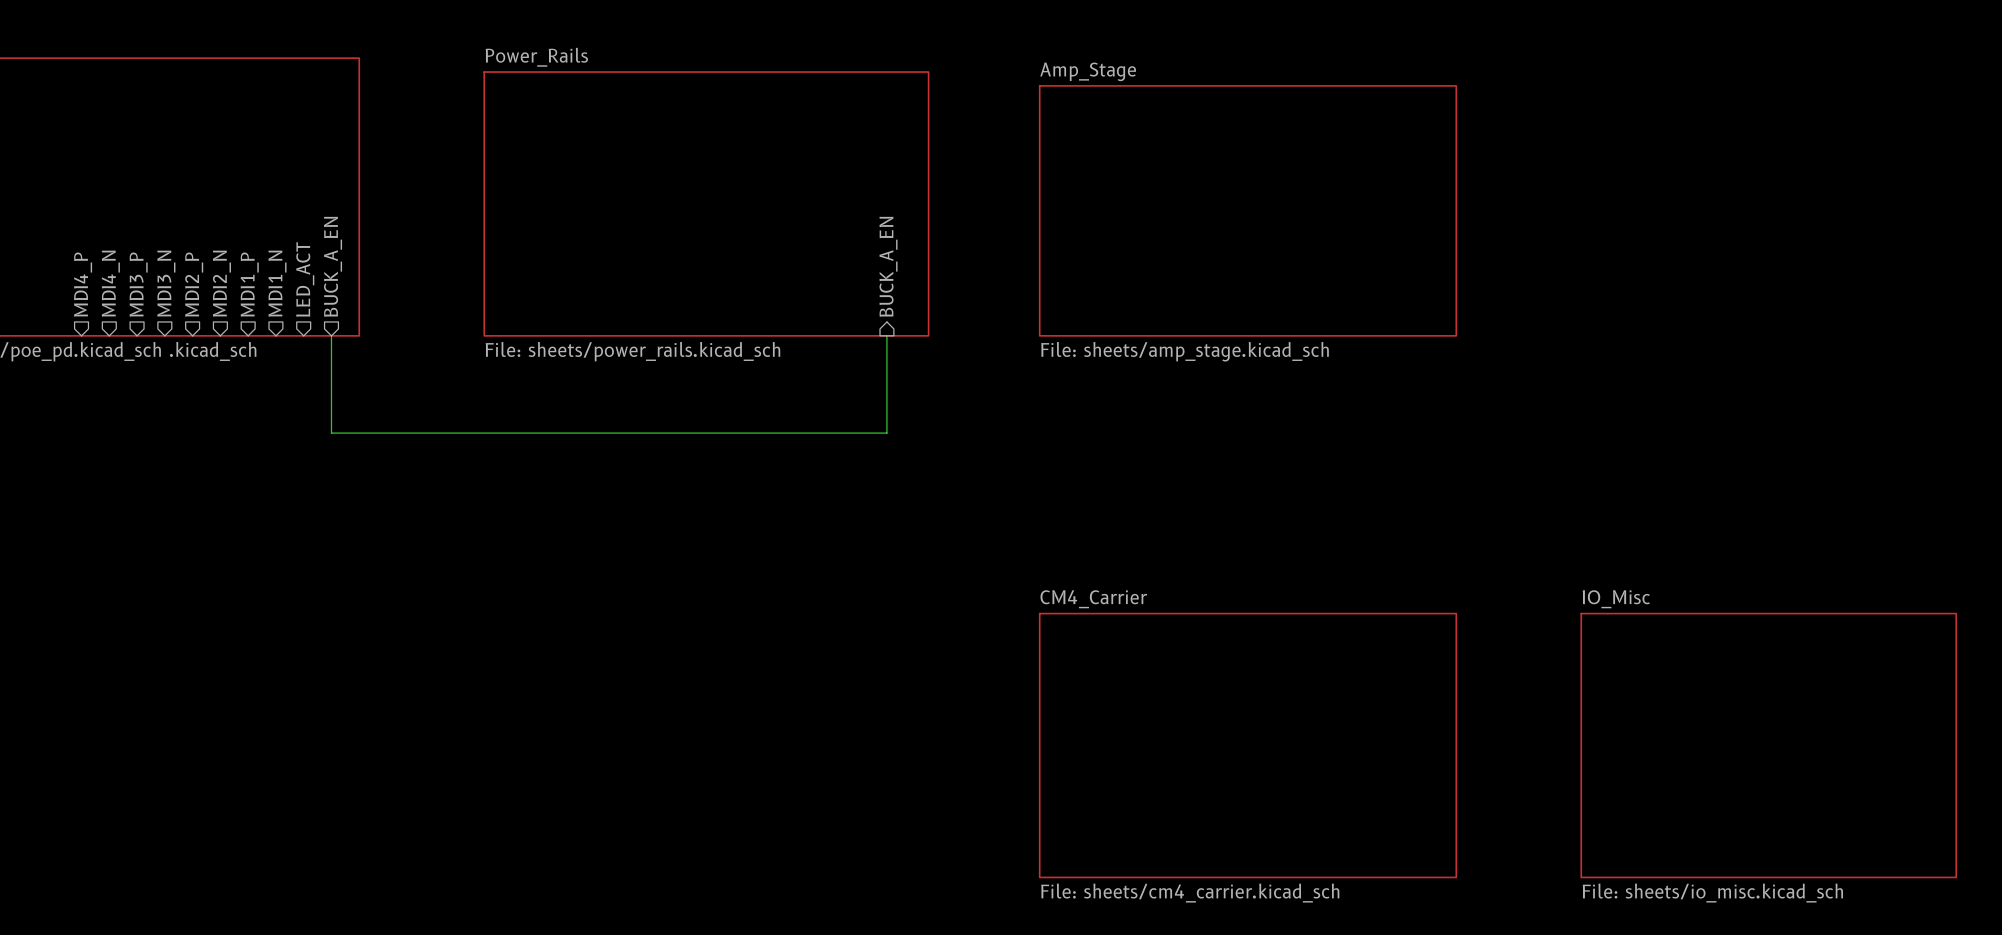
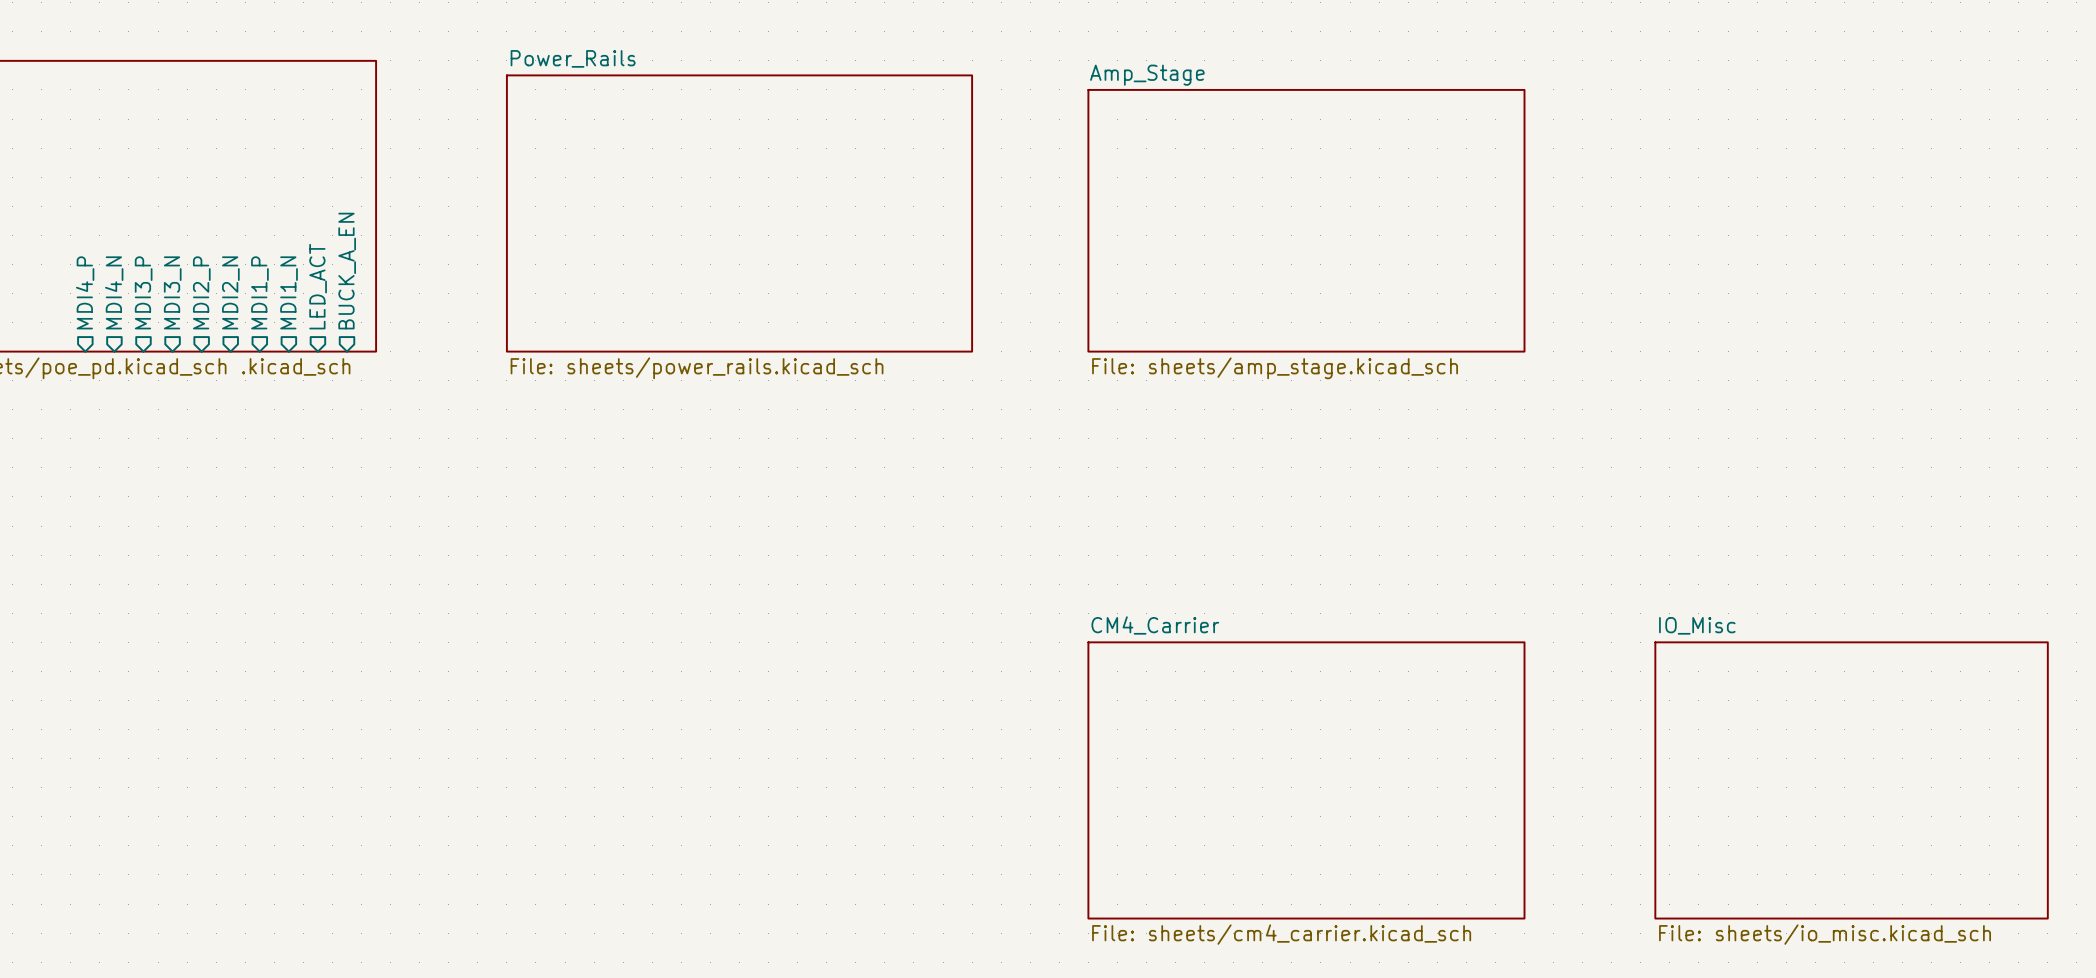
sheet pin: BUCK_A_EN (888, 266) -> none
wire: (331, 335) (331, 433) (886, 433) (886, 335) -> none

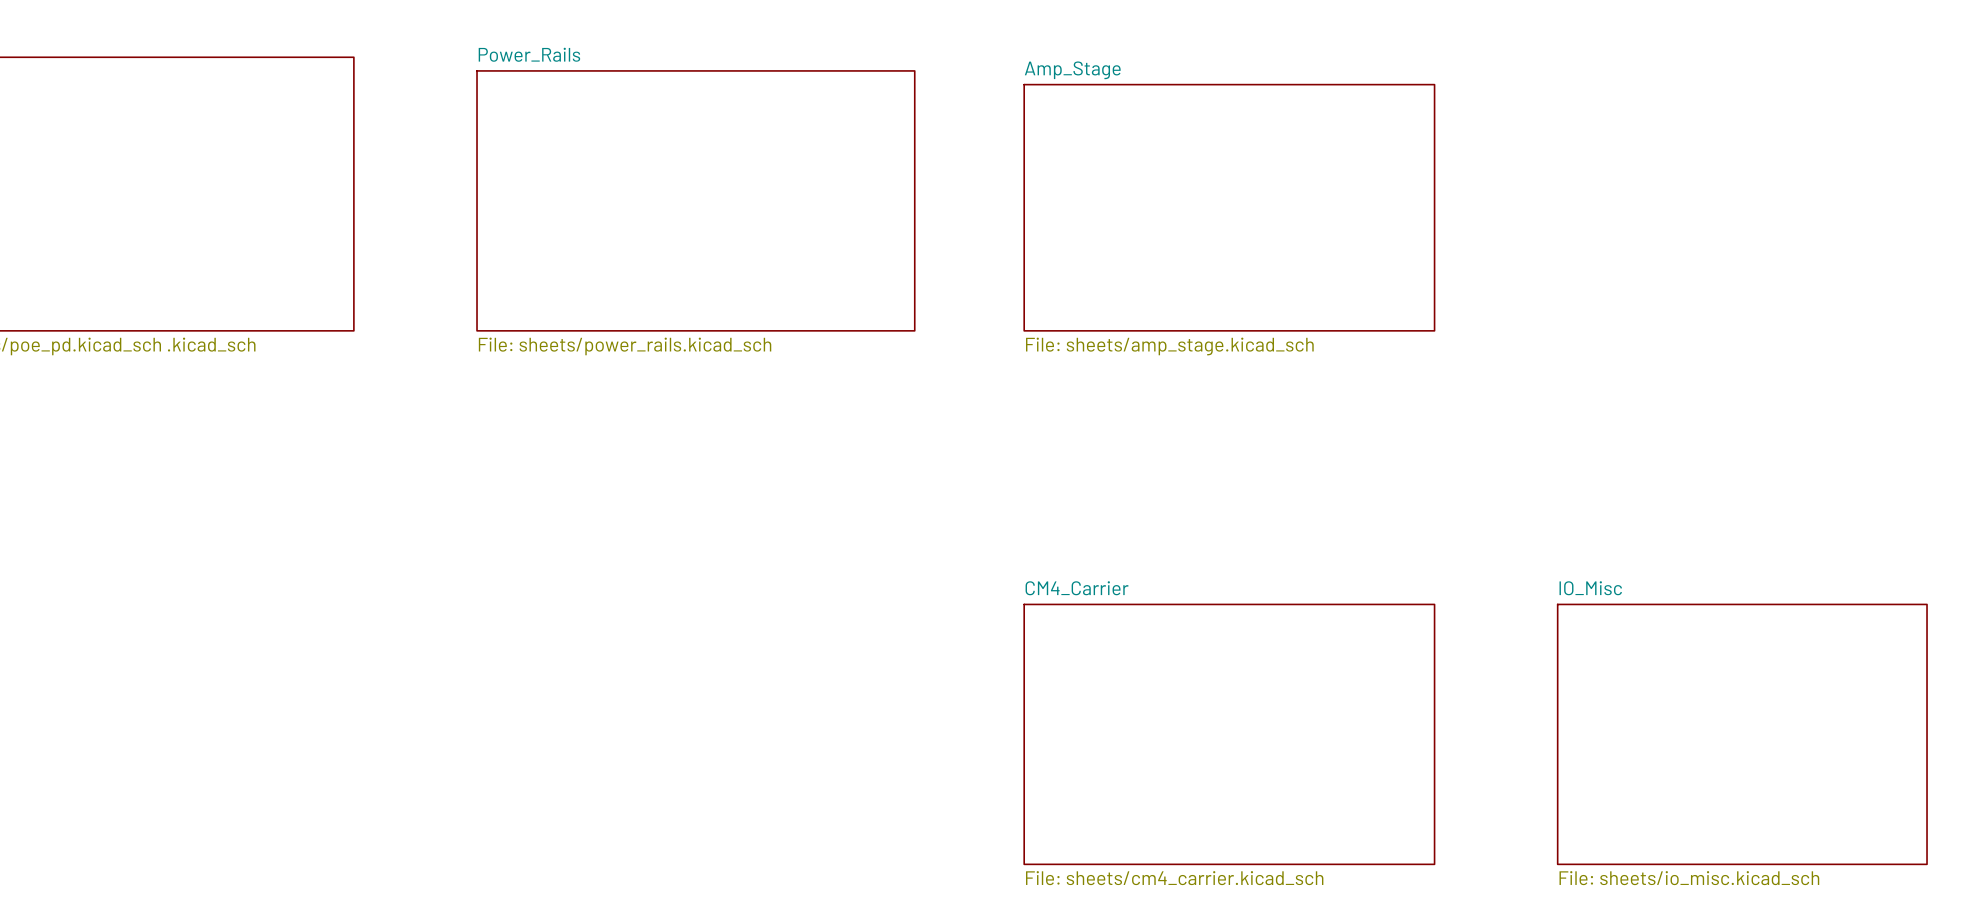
sheet pin: BUCK_A_EN (347, 271) -> none
sheet pin: LED_ACT (318, 286) -> none
sheet pin: MDI4_P (85, 292) -> none
sheet pin: MDI4_N (114, 292) -> none
sheet pin: MDI3_P (143, 292) -> none
sheet pin: MDI3_N (172, 292) -> none
sheet pin: MDI2_P (201, 292) -> none
sheet pin: MDI2_N (230, 292) -> none
sheet pin: MDI1_P (259, 292) -> none
sheet pin: MDI1_N (289, 292) -> none

